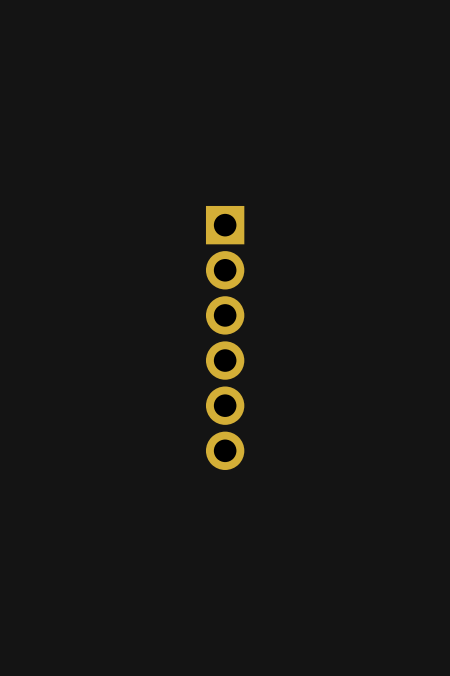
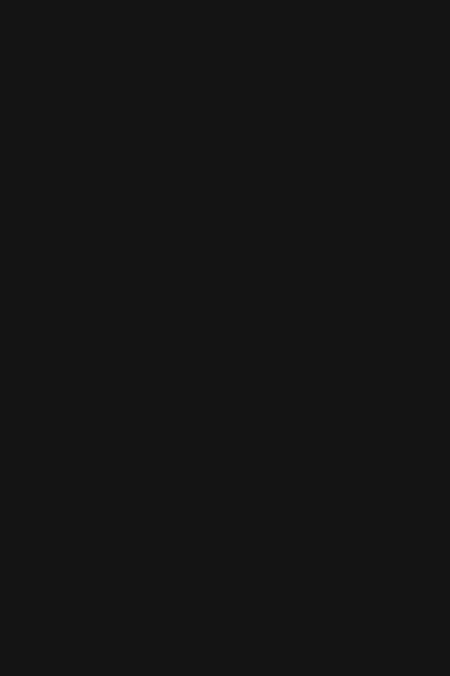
part: (225, 337) -> none

